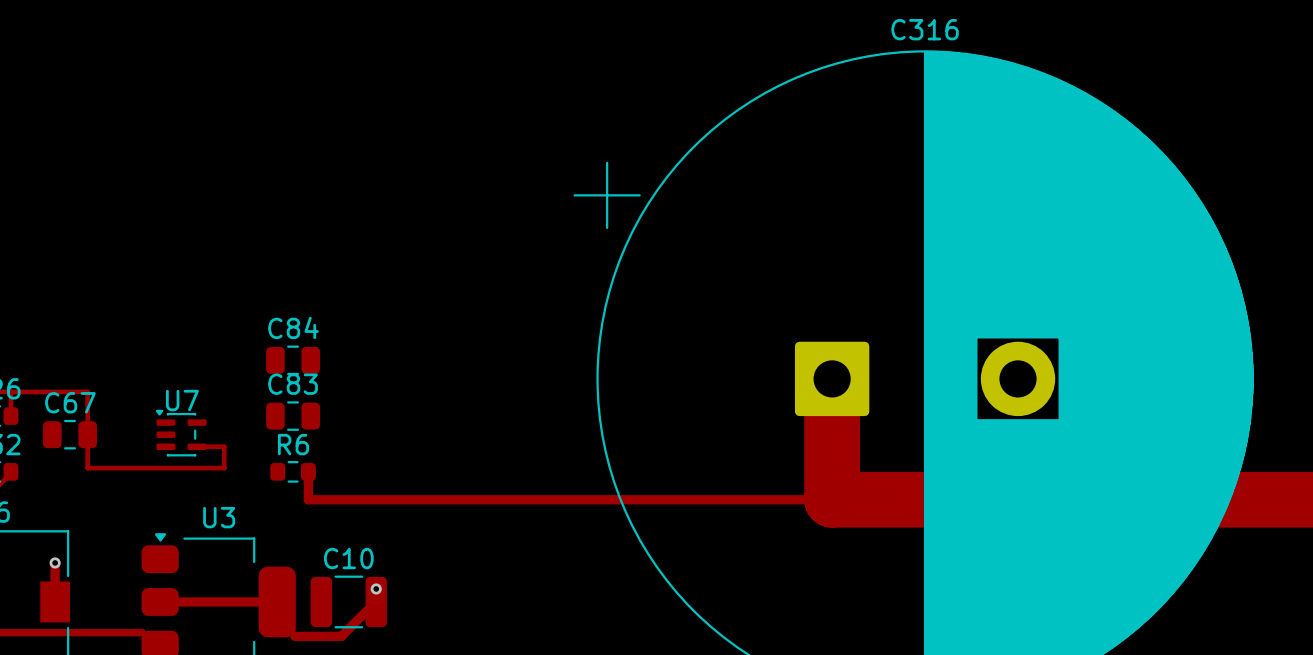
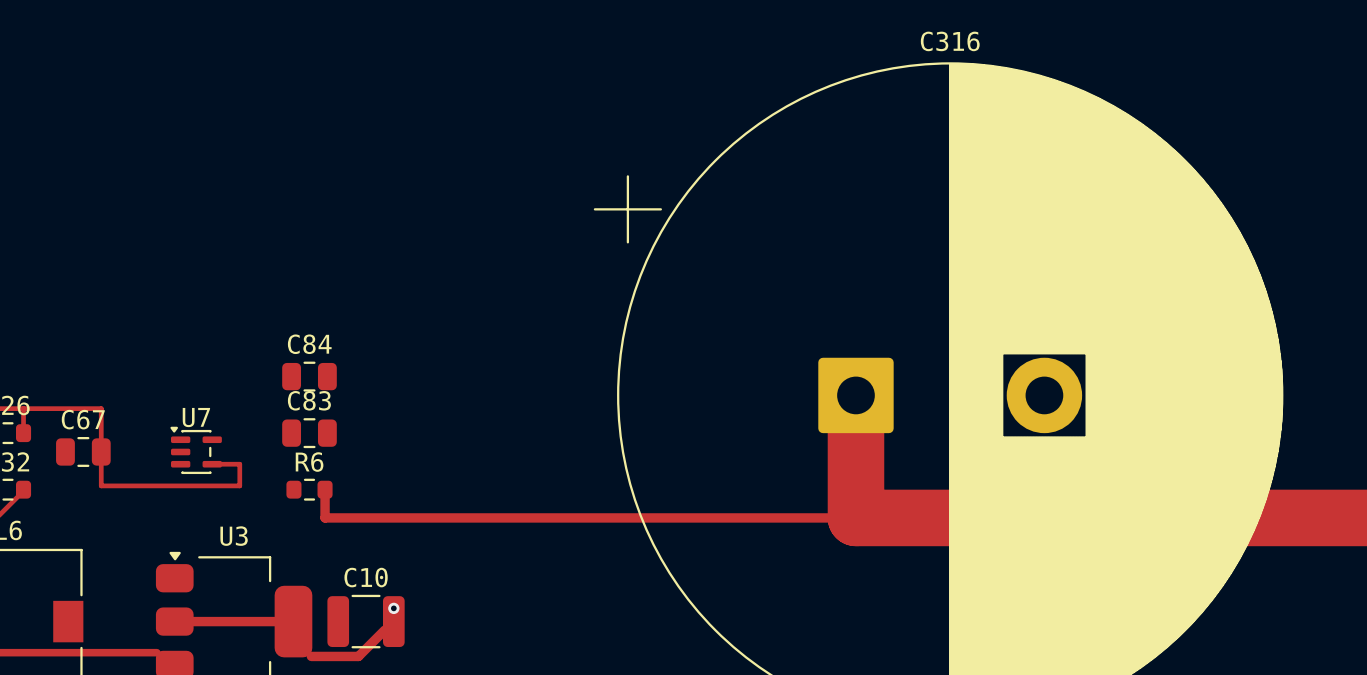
track: (55, 562) (55, 592) -> none
via: (55, 562) -> none

